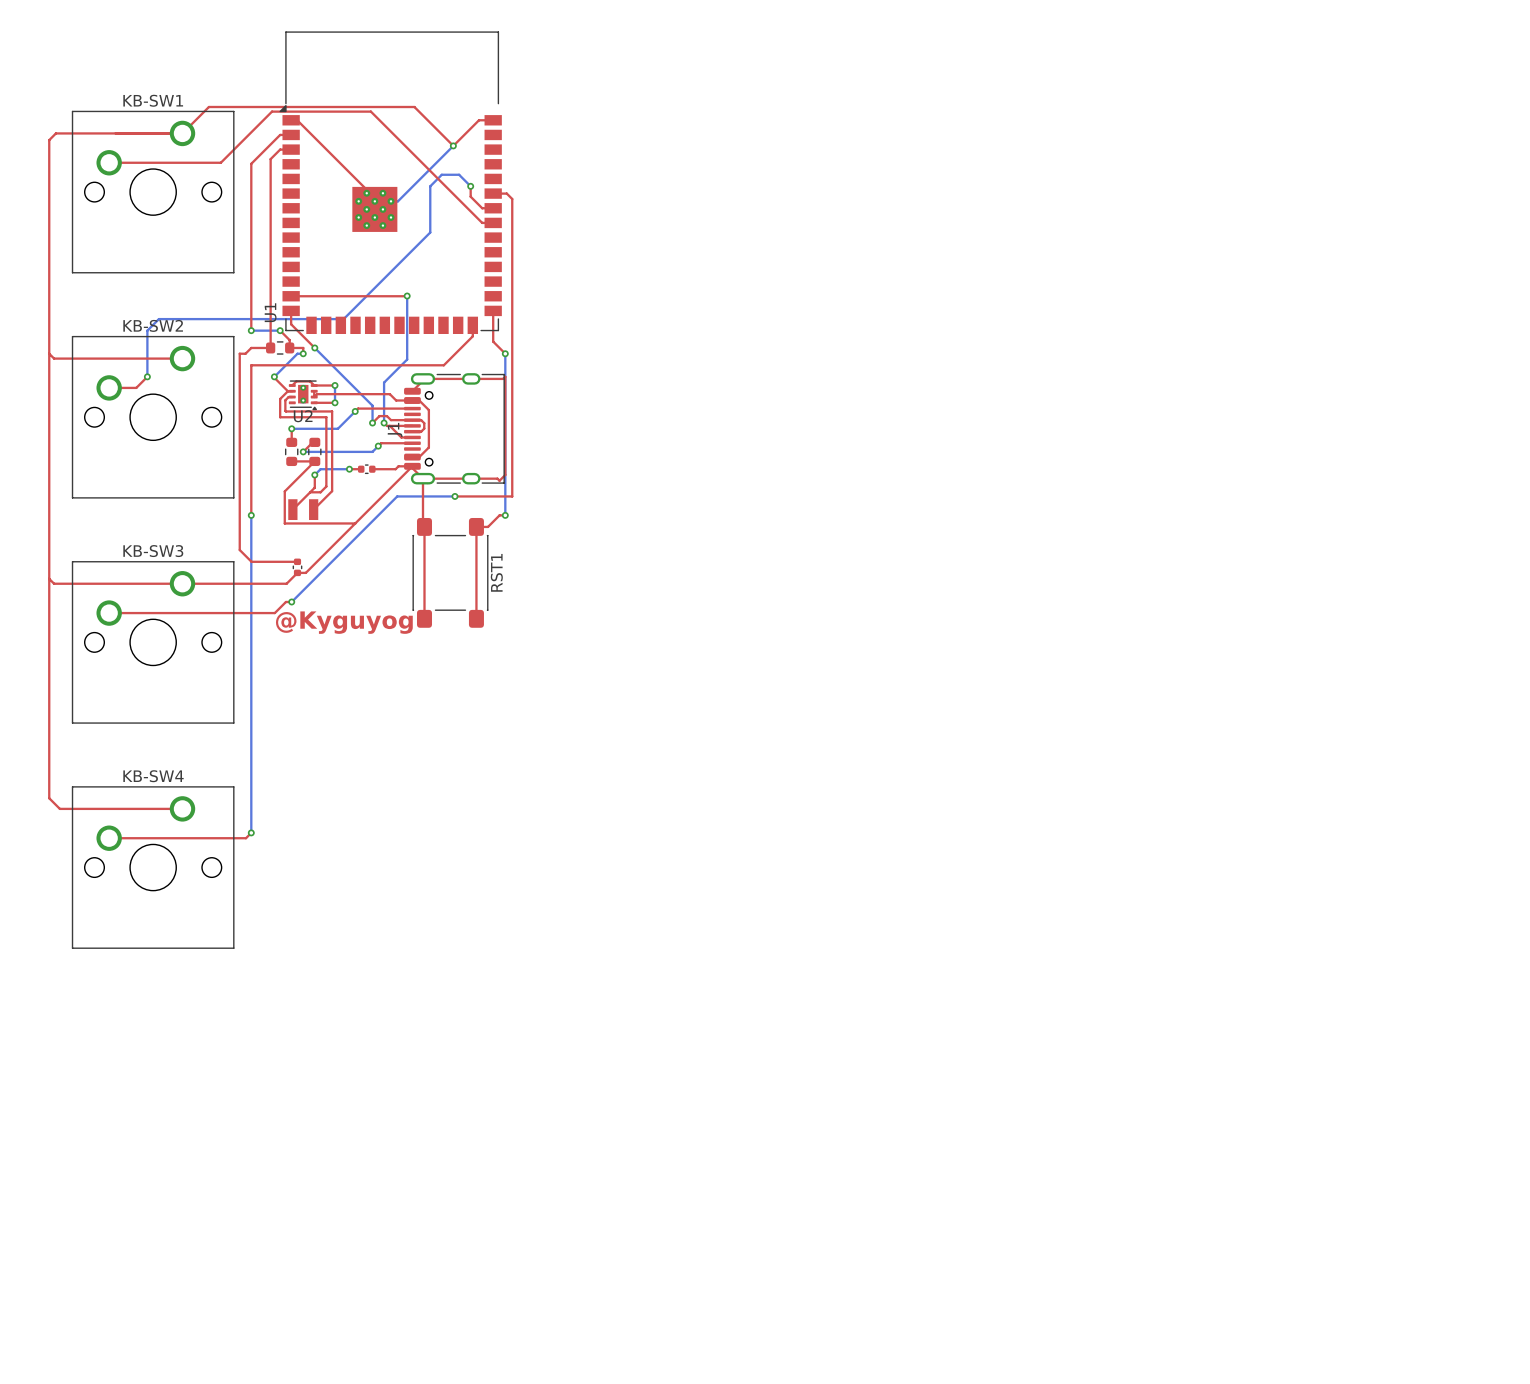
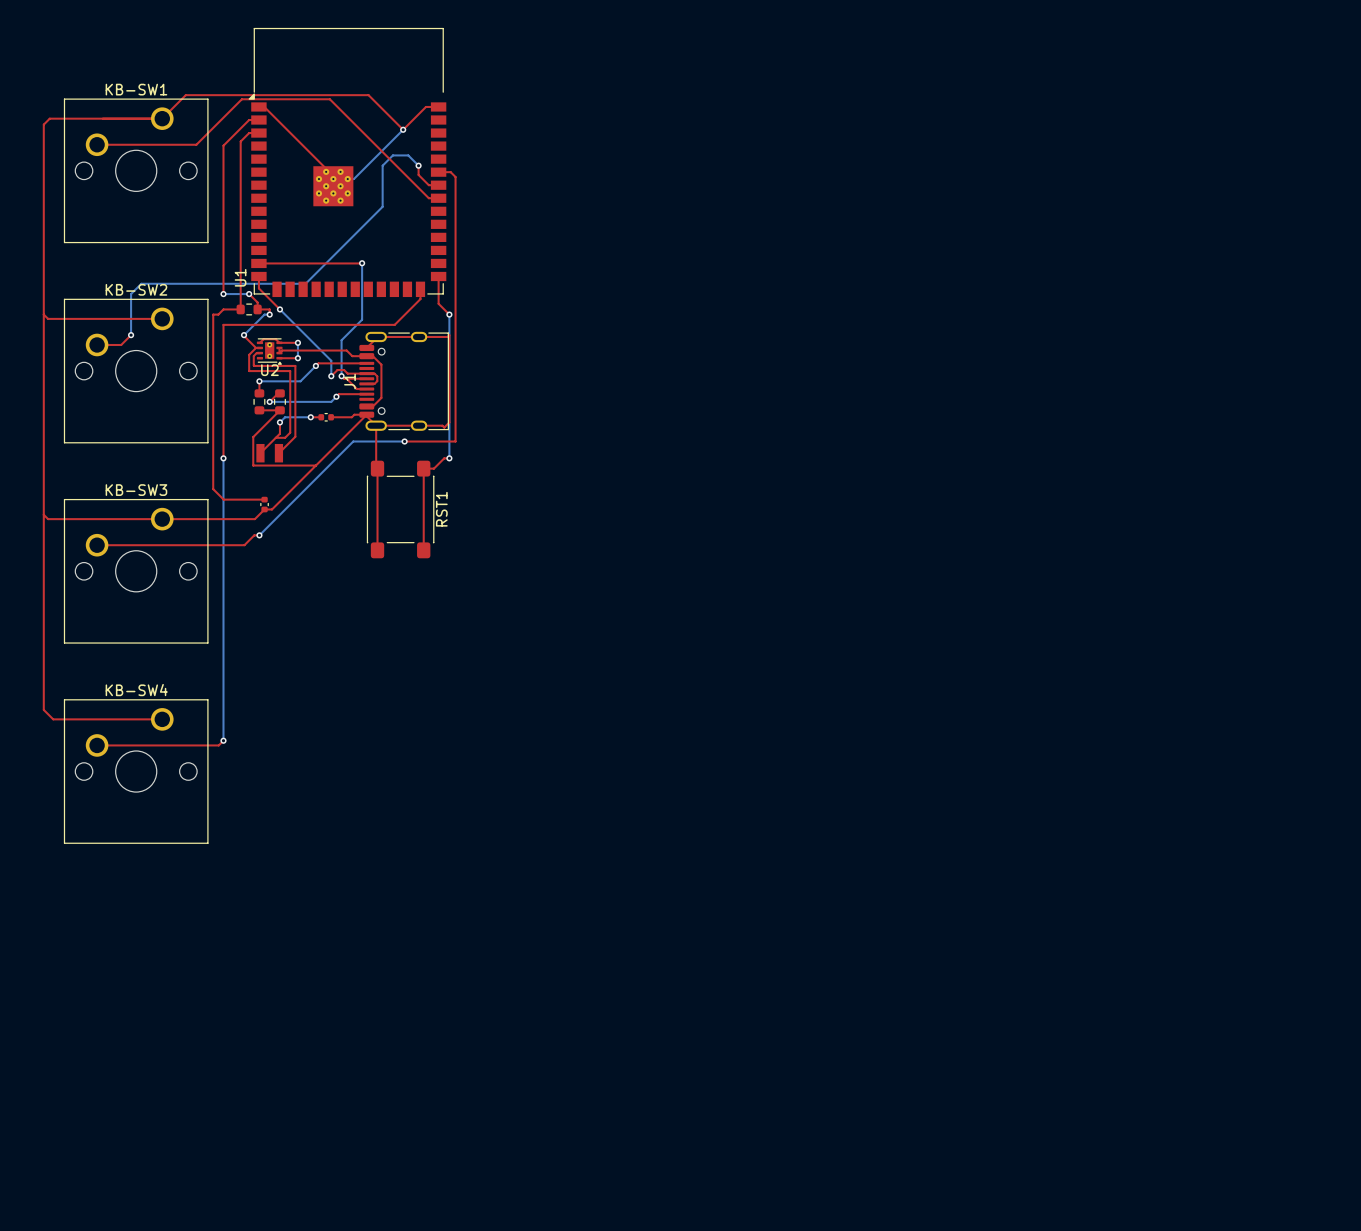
text: @Kyguyog (344, 622) -> none

